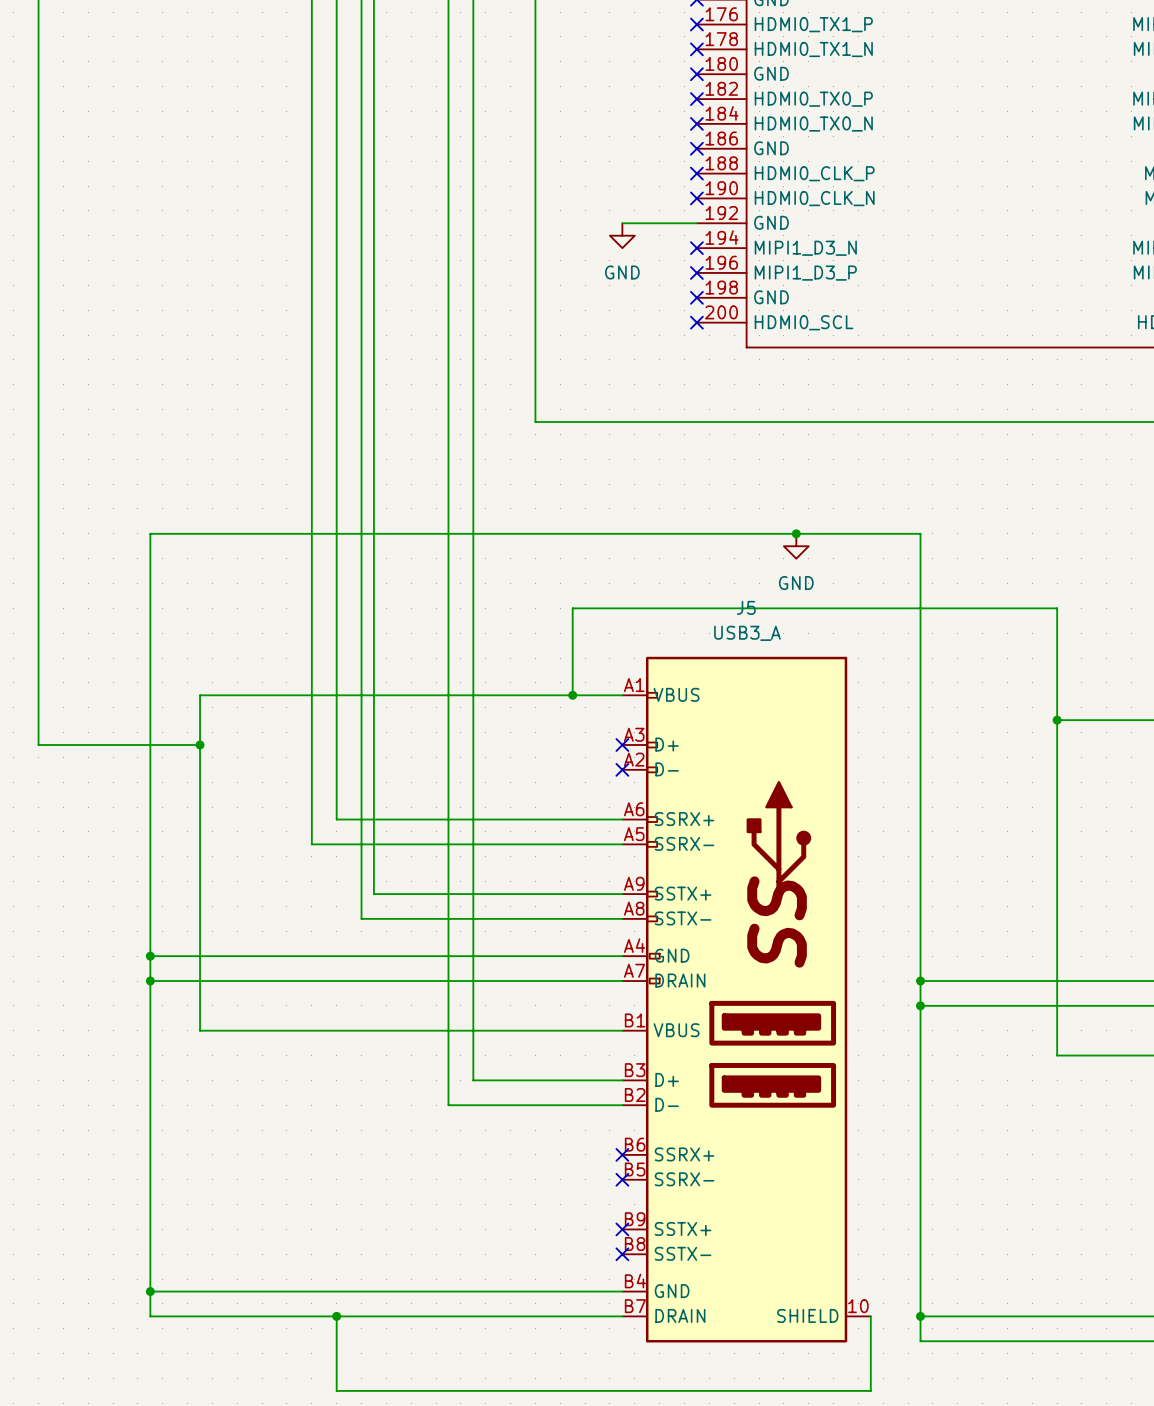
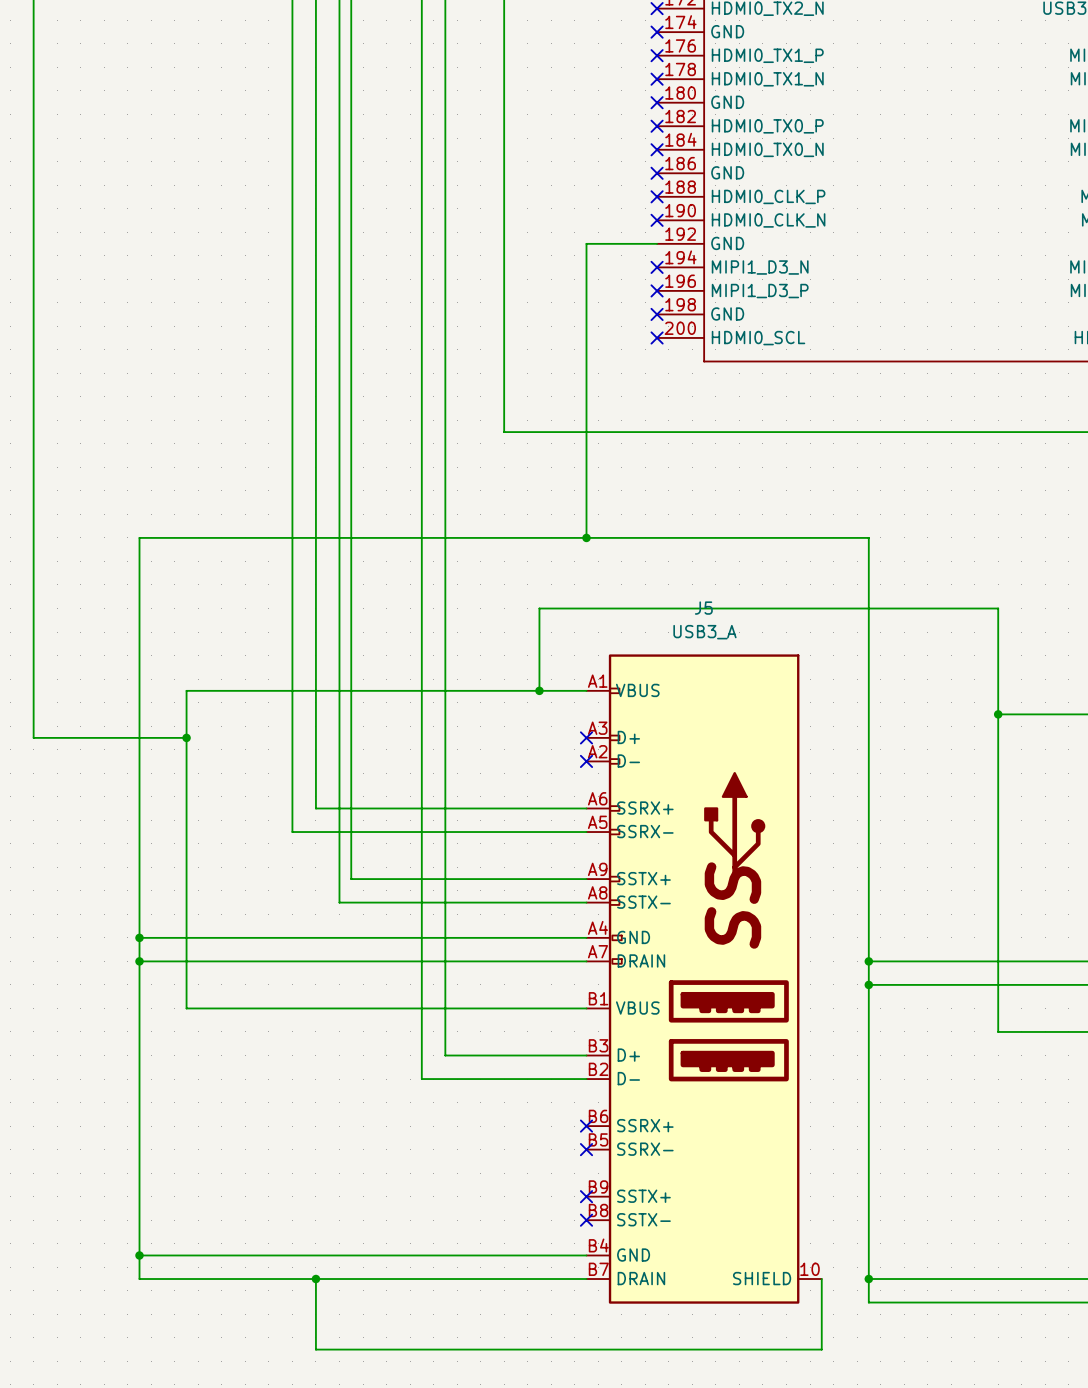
wire: none -> (586, 243) (586, 537)
power symbol: GND (622, 235) -> none
junction: none -> (586, 537)
junction: (796, 533) -> none
power symbol: GND (796, 546) -> none

